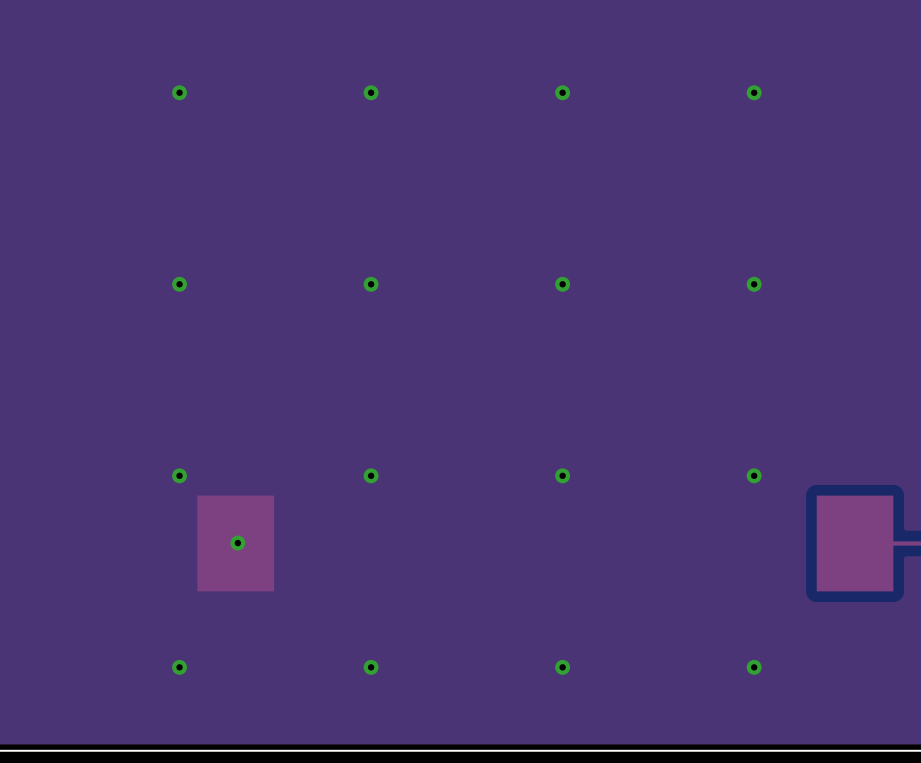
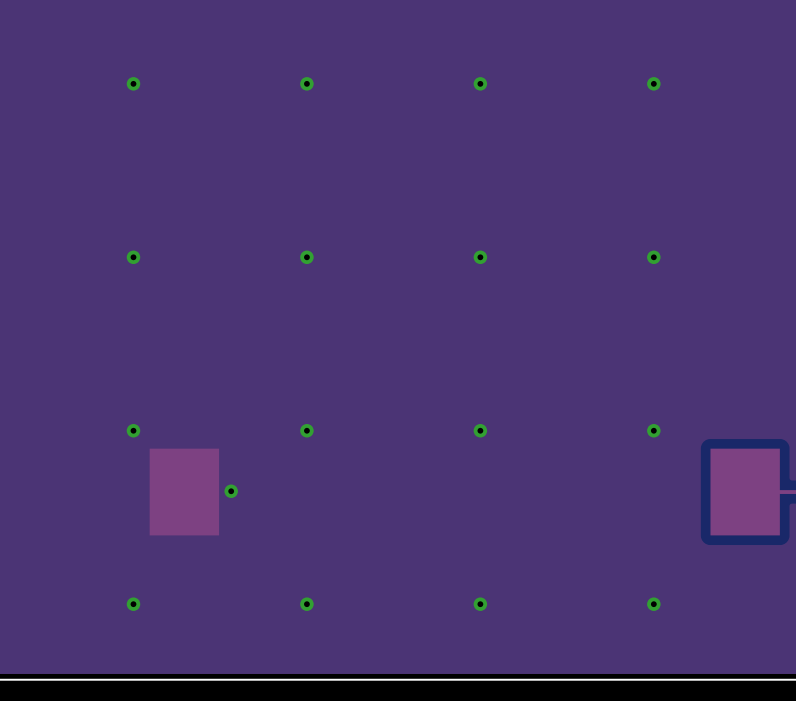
via position: (237, 543) -> (231, 491)

